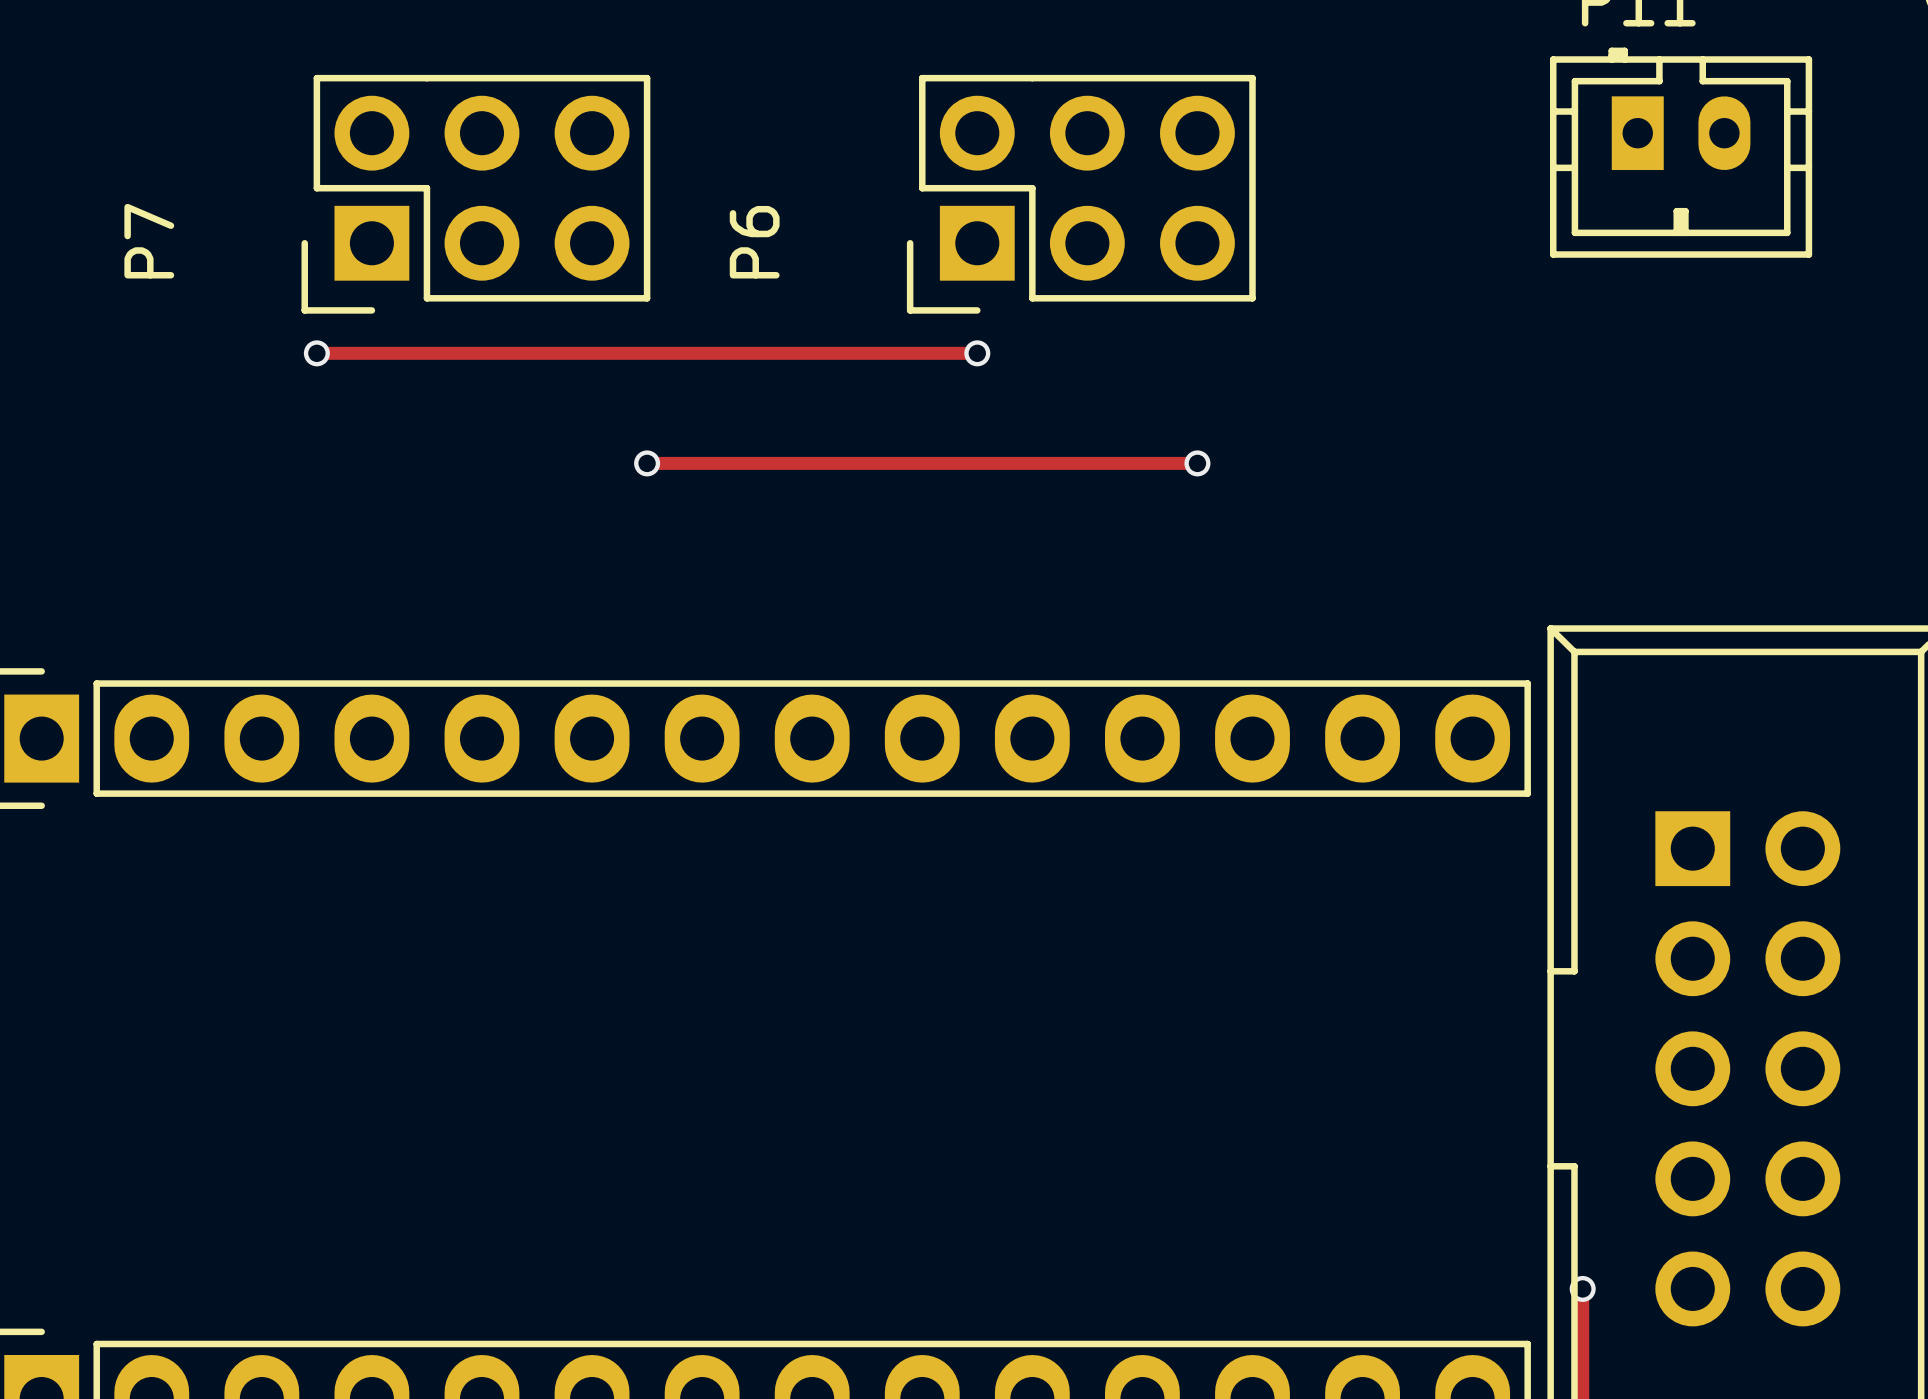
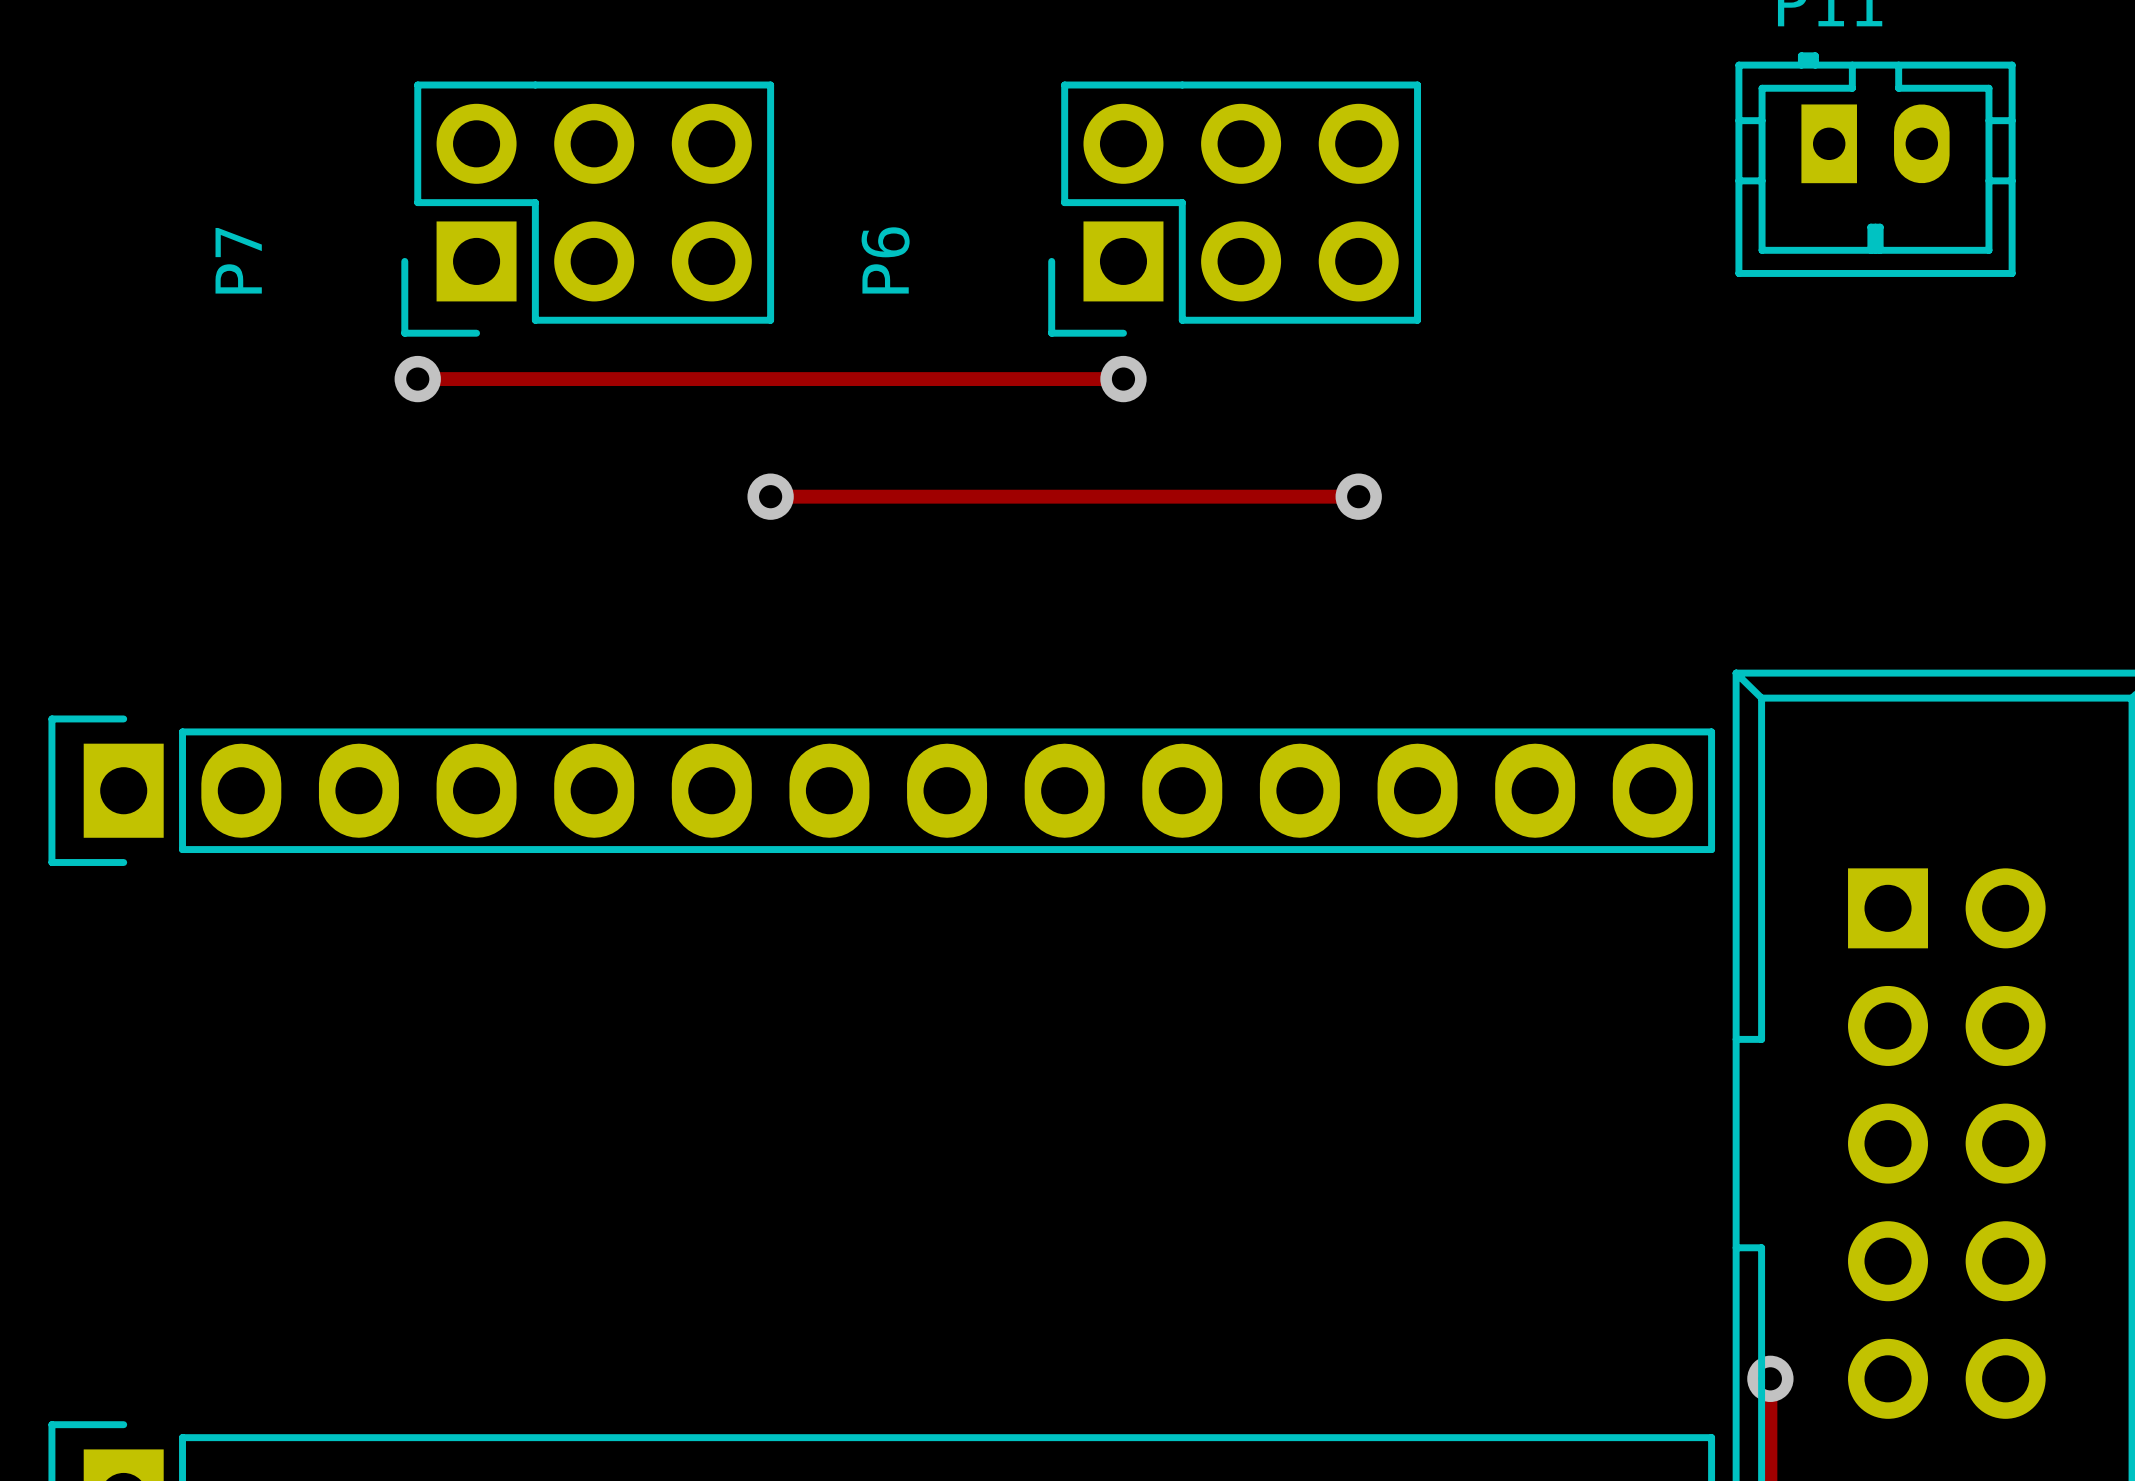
via size: [303, 340, 330, 367] -> [394, 355, 441, 403]
via size: [964, 340, 991, 367] -> [1100, 355, 1147, 403]
via size: [634, 450, 661, 477] -> [747, 473, 794, 520]
via size: [1184, 450, 1211, 477] -> [1335, 473, 1382, 520]
via size: [1569, 1275, 1596, 1302] -> [1747, 1355, 1794, 1402]

